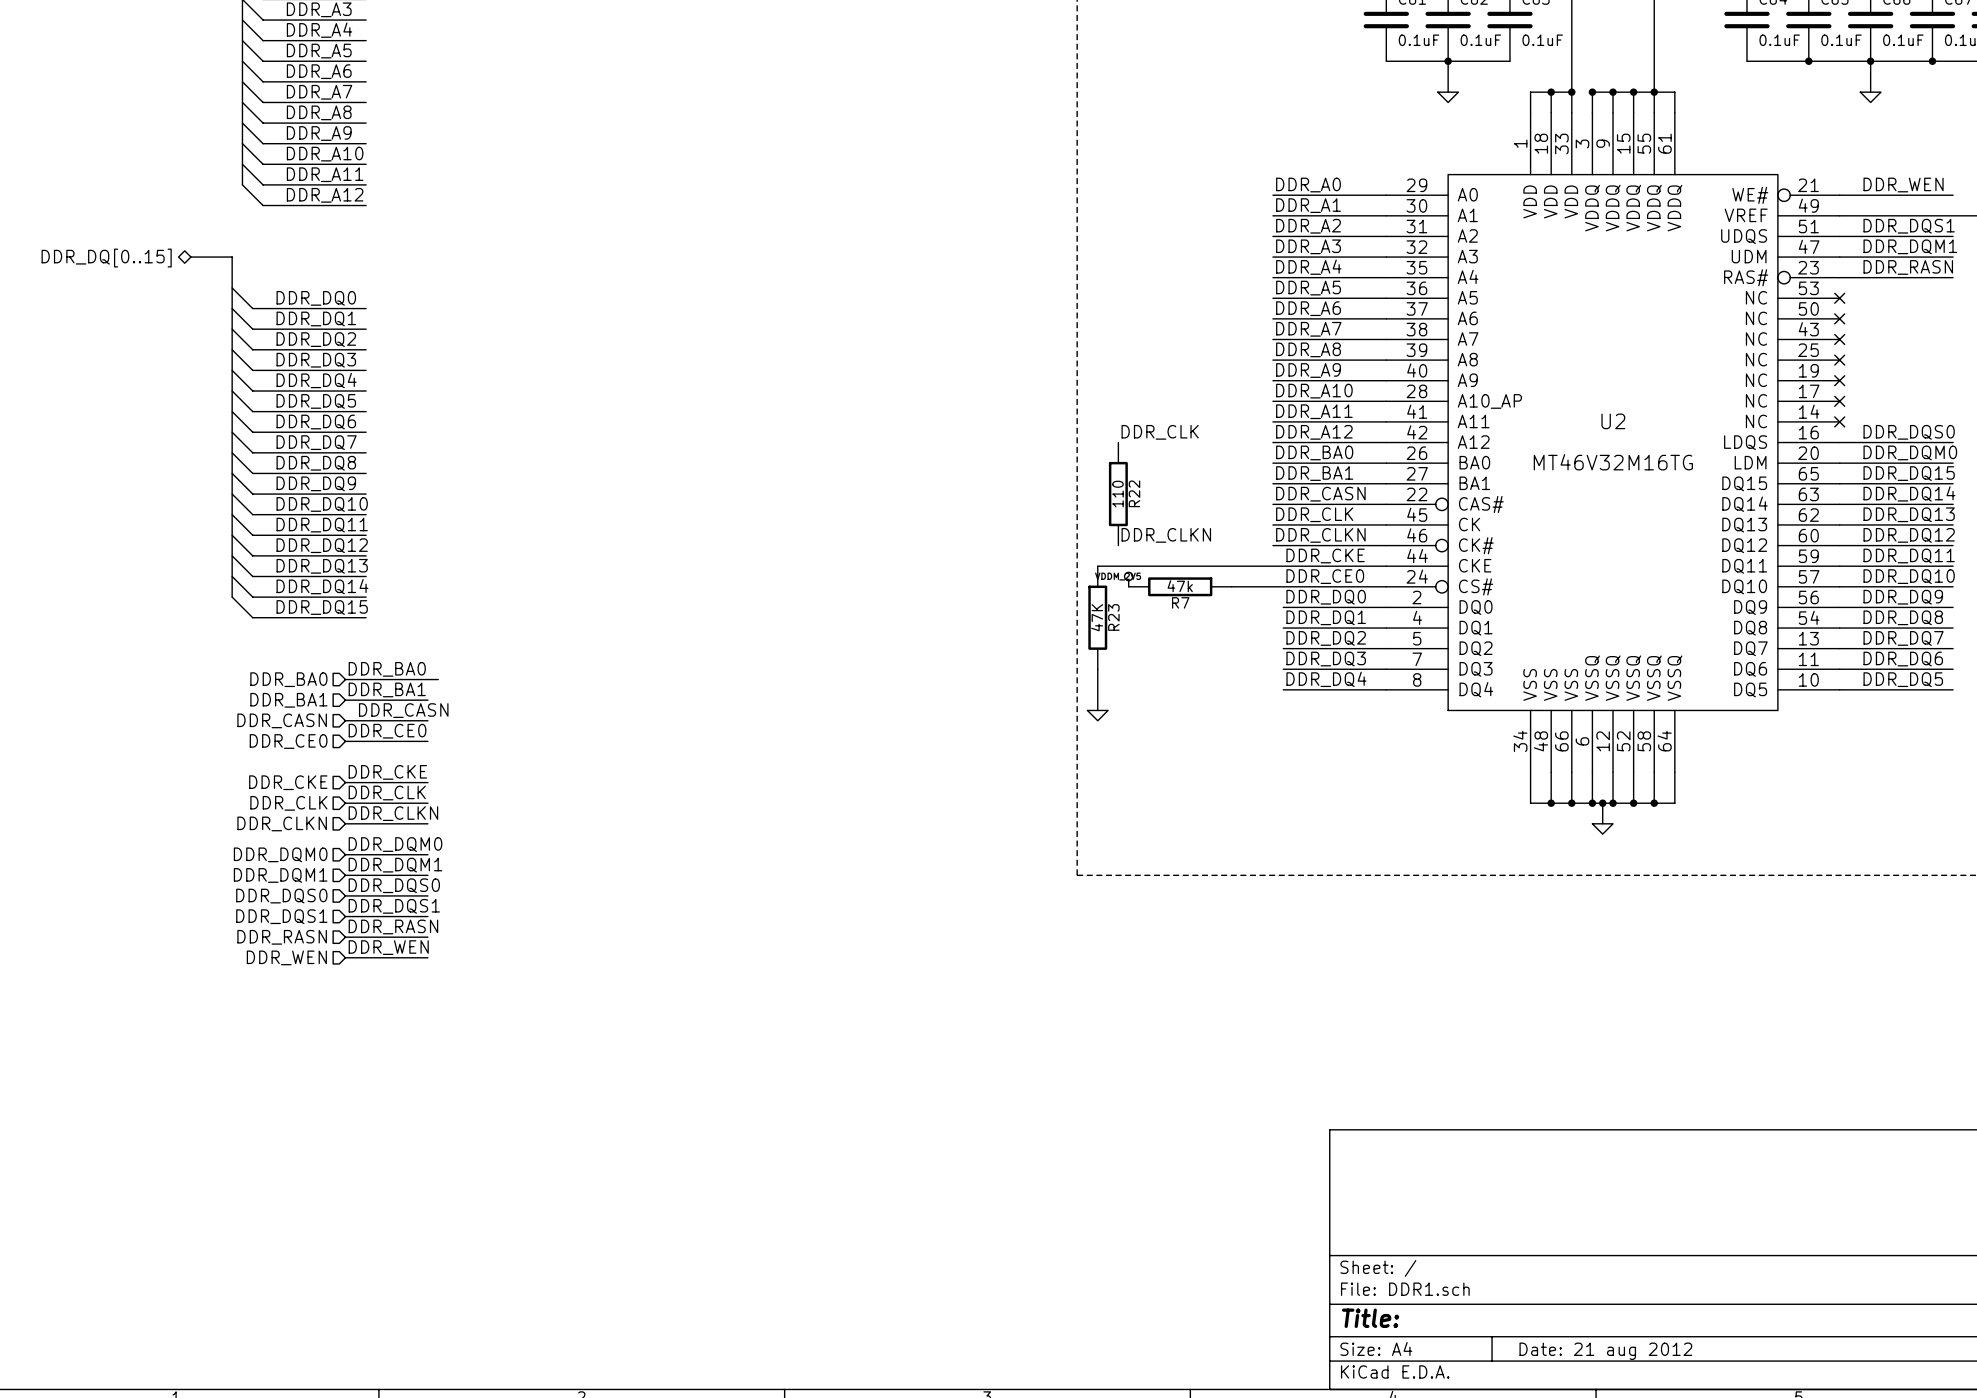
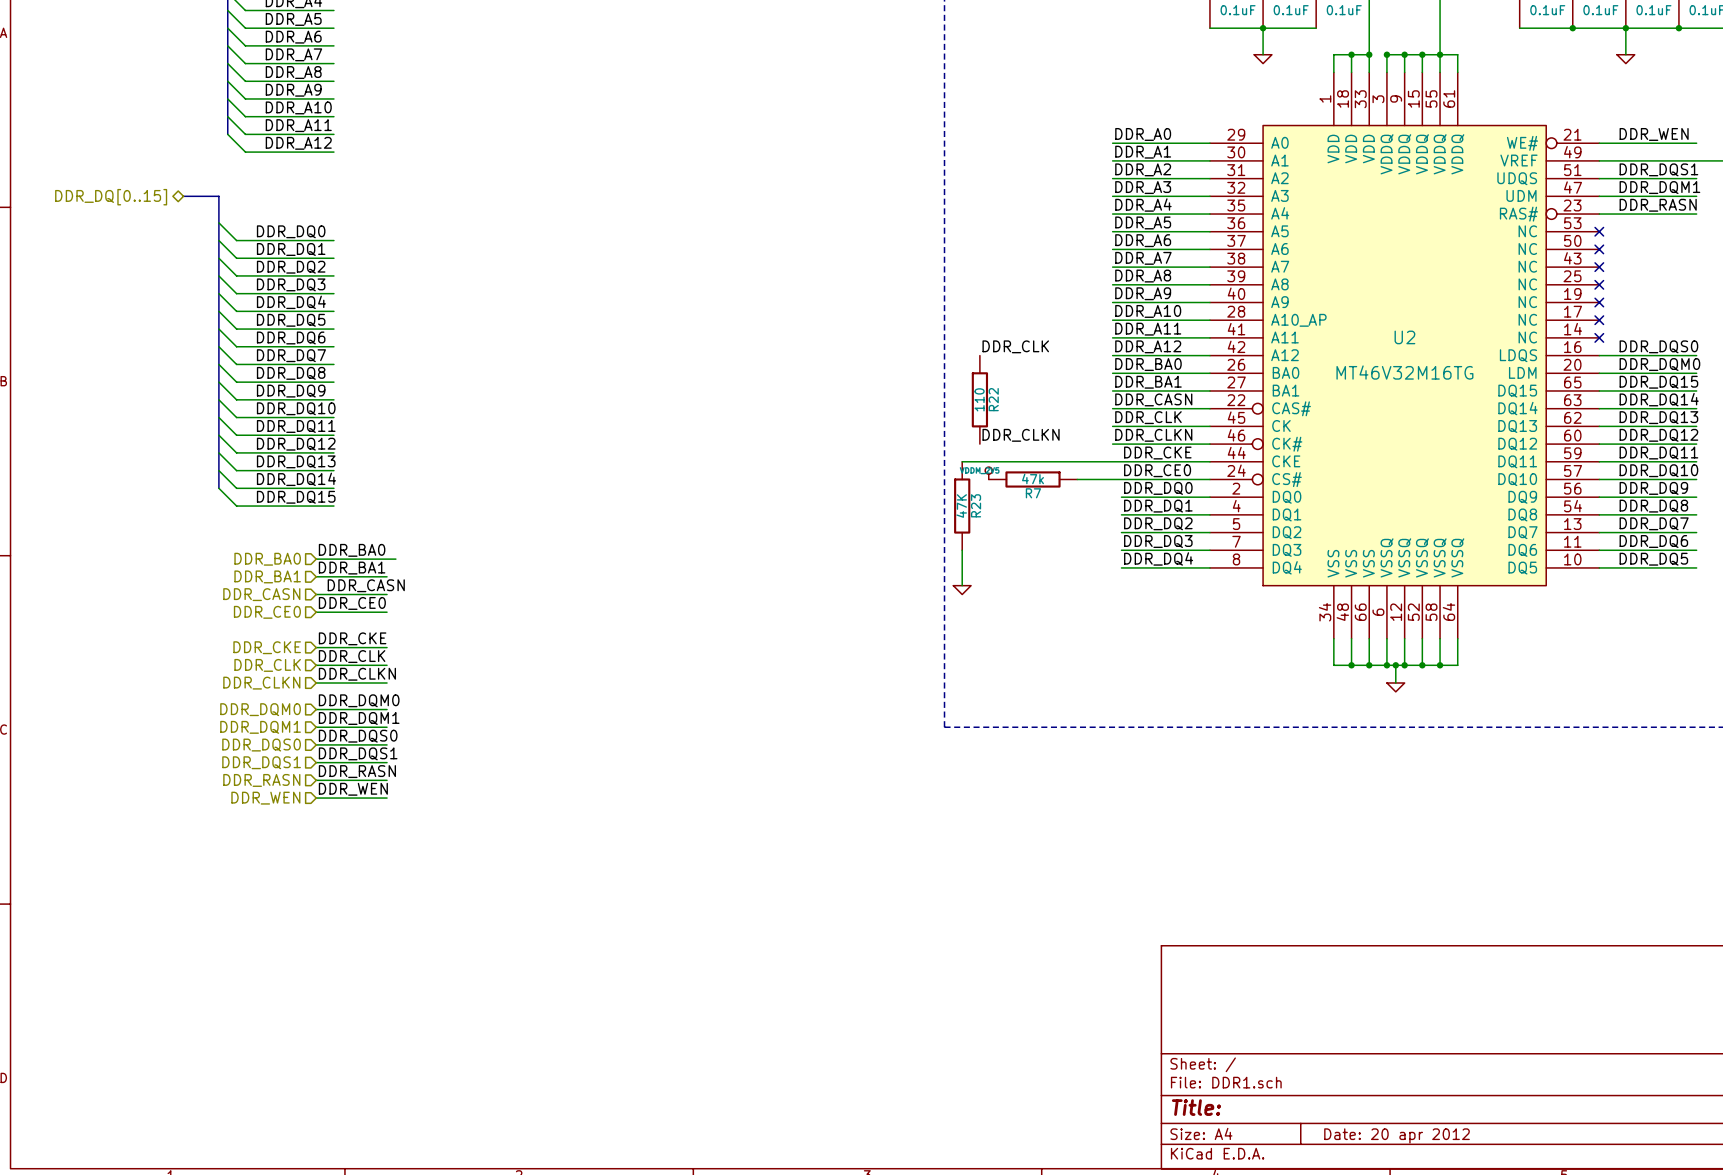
title block: Date: 21 aug 2012 (1605, 1351) -> Date: 20 apr 2012 (1397, 1135)

